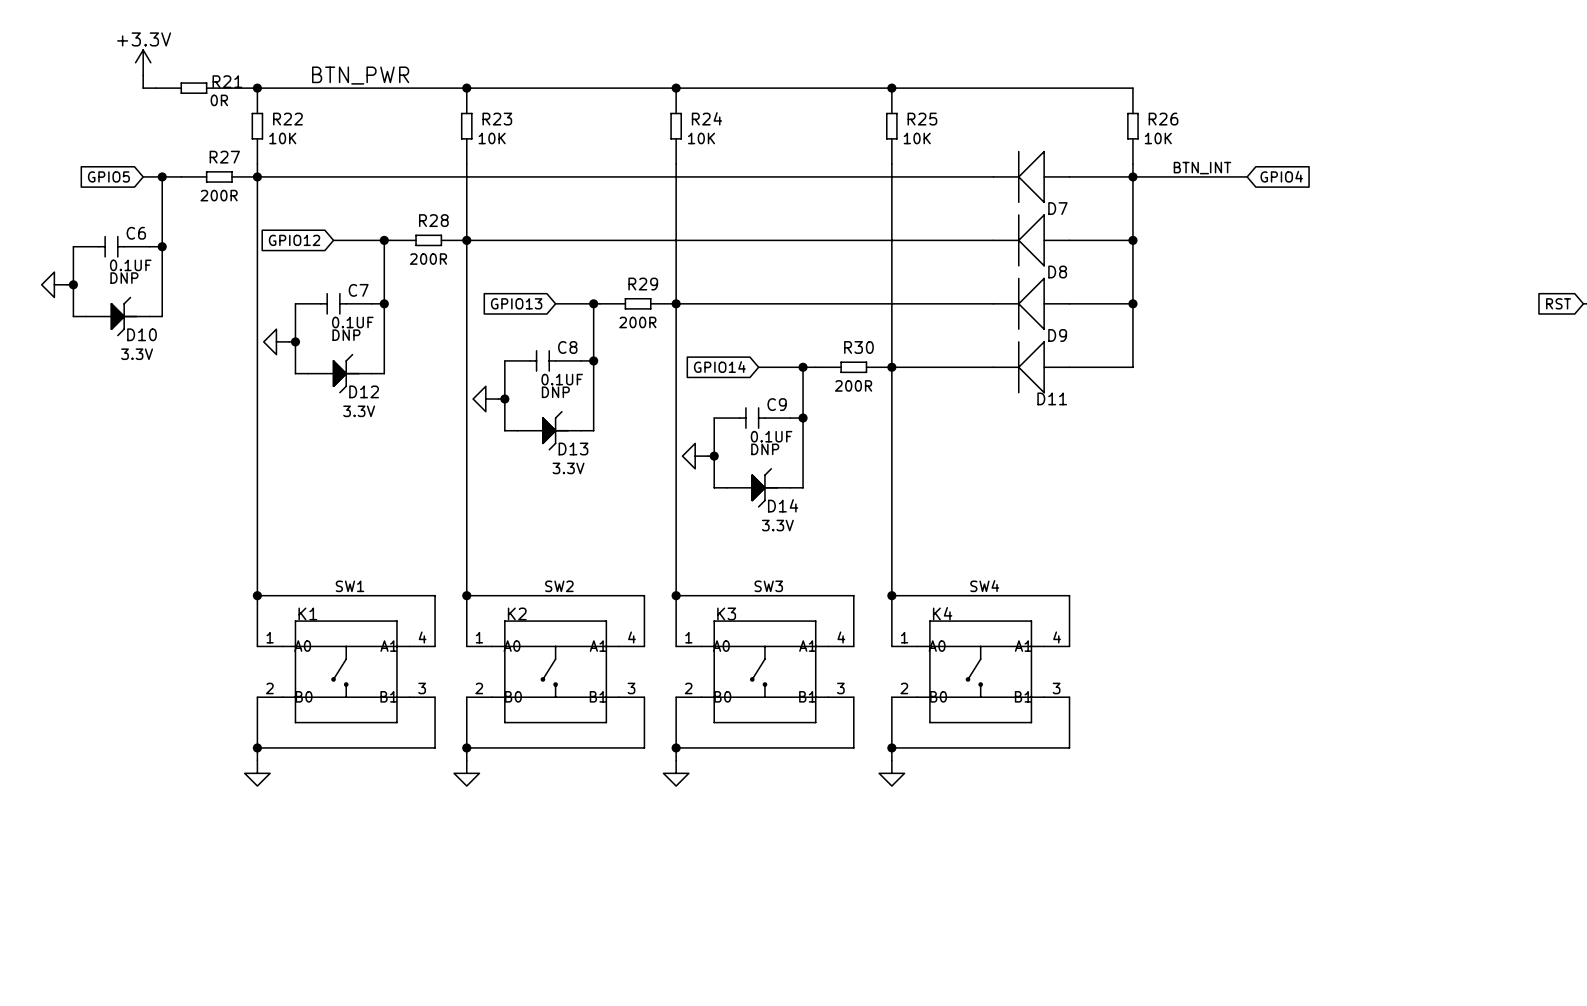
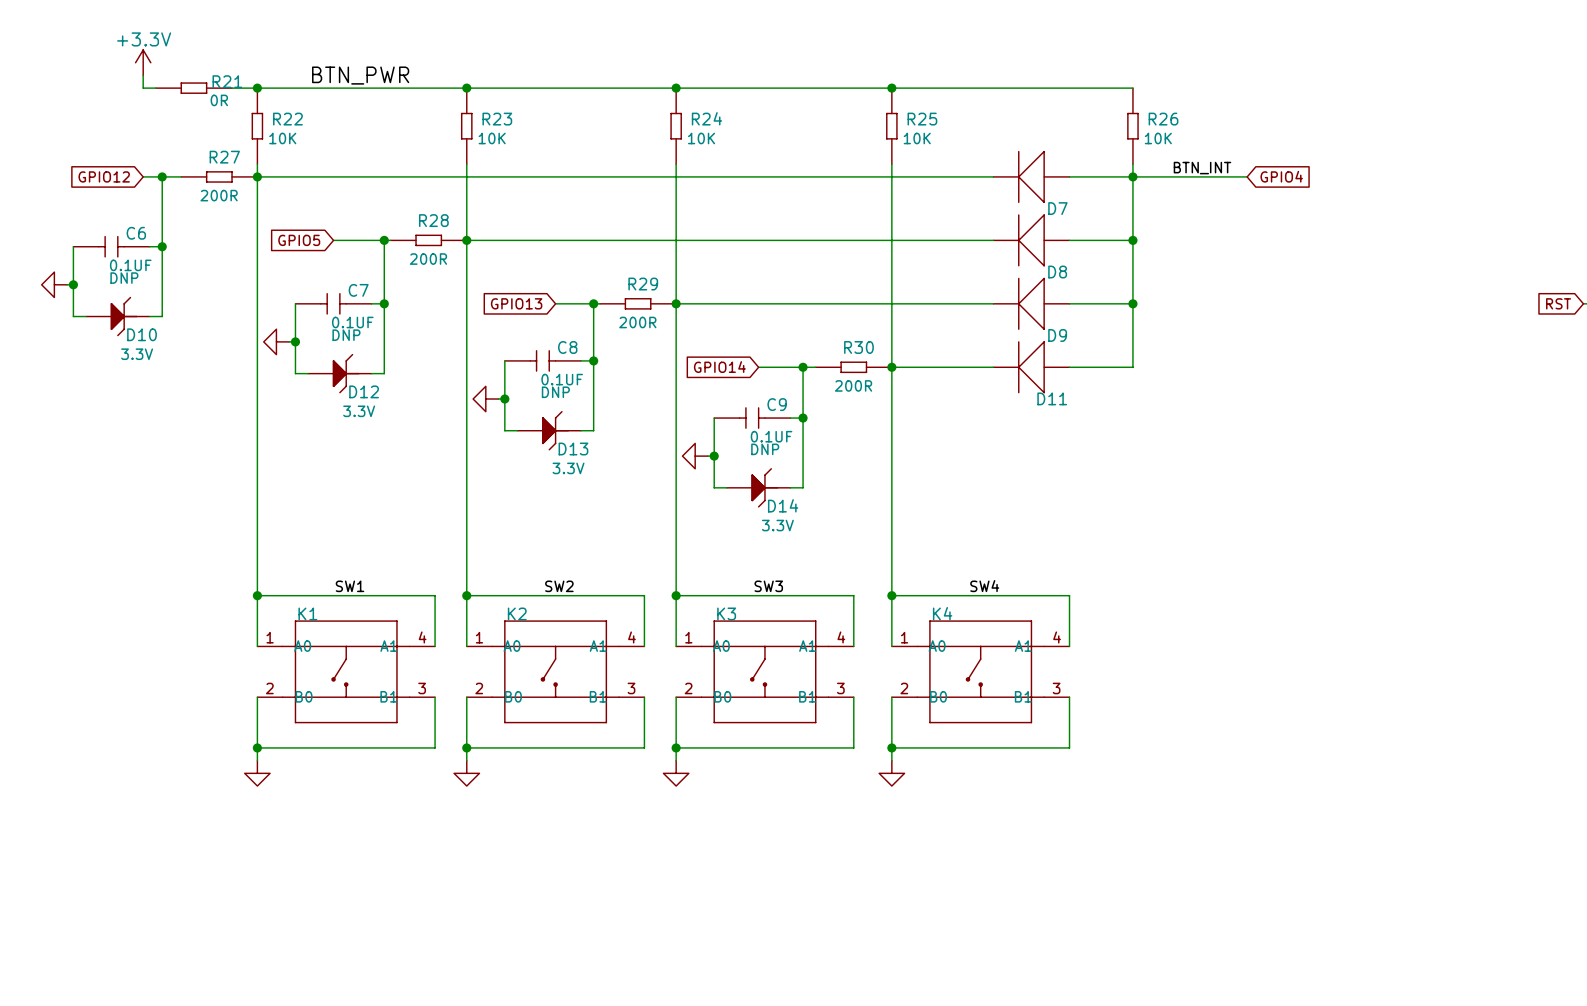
global label: GPIO5 (108, 176) -> GPIO12 (104, 176)
global label: GPIO12 (294, 240) -> GPIO5 (299, 240)

